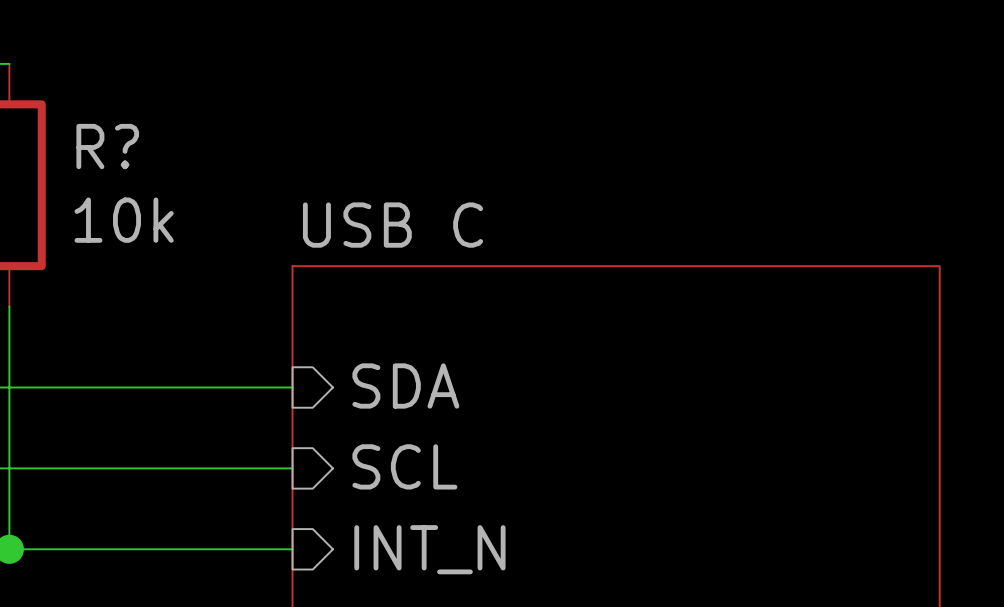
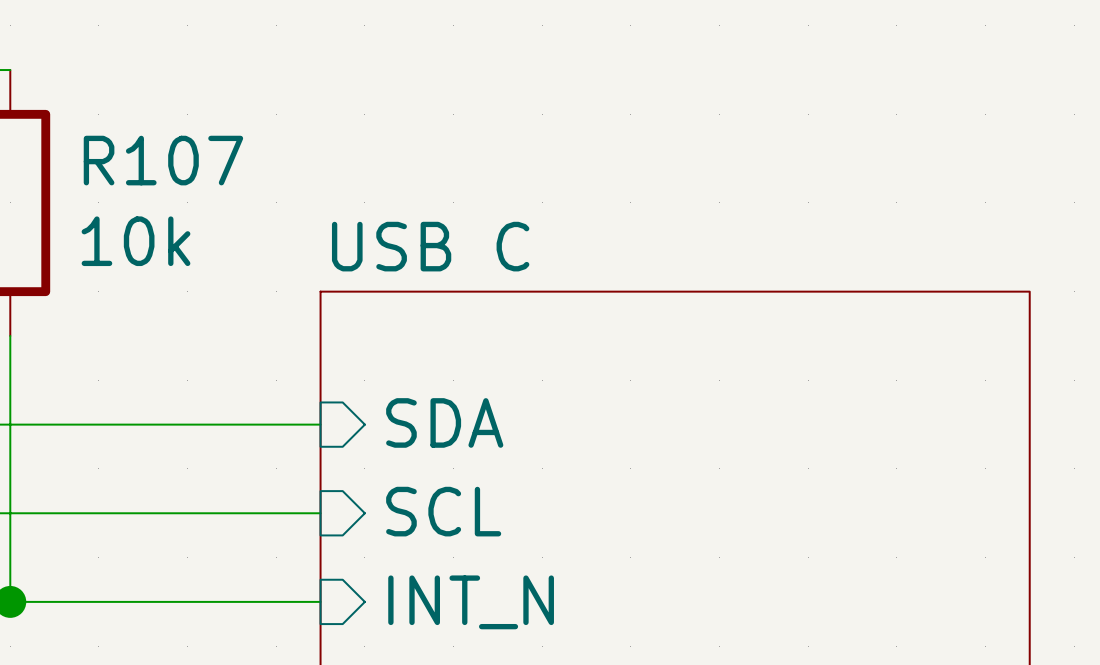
R? name: R? (107, 146) -> R107 (163, 160)

